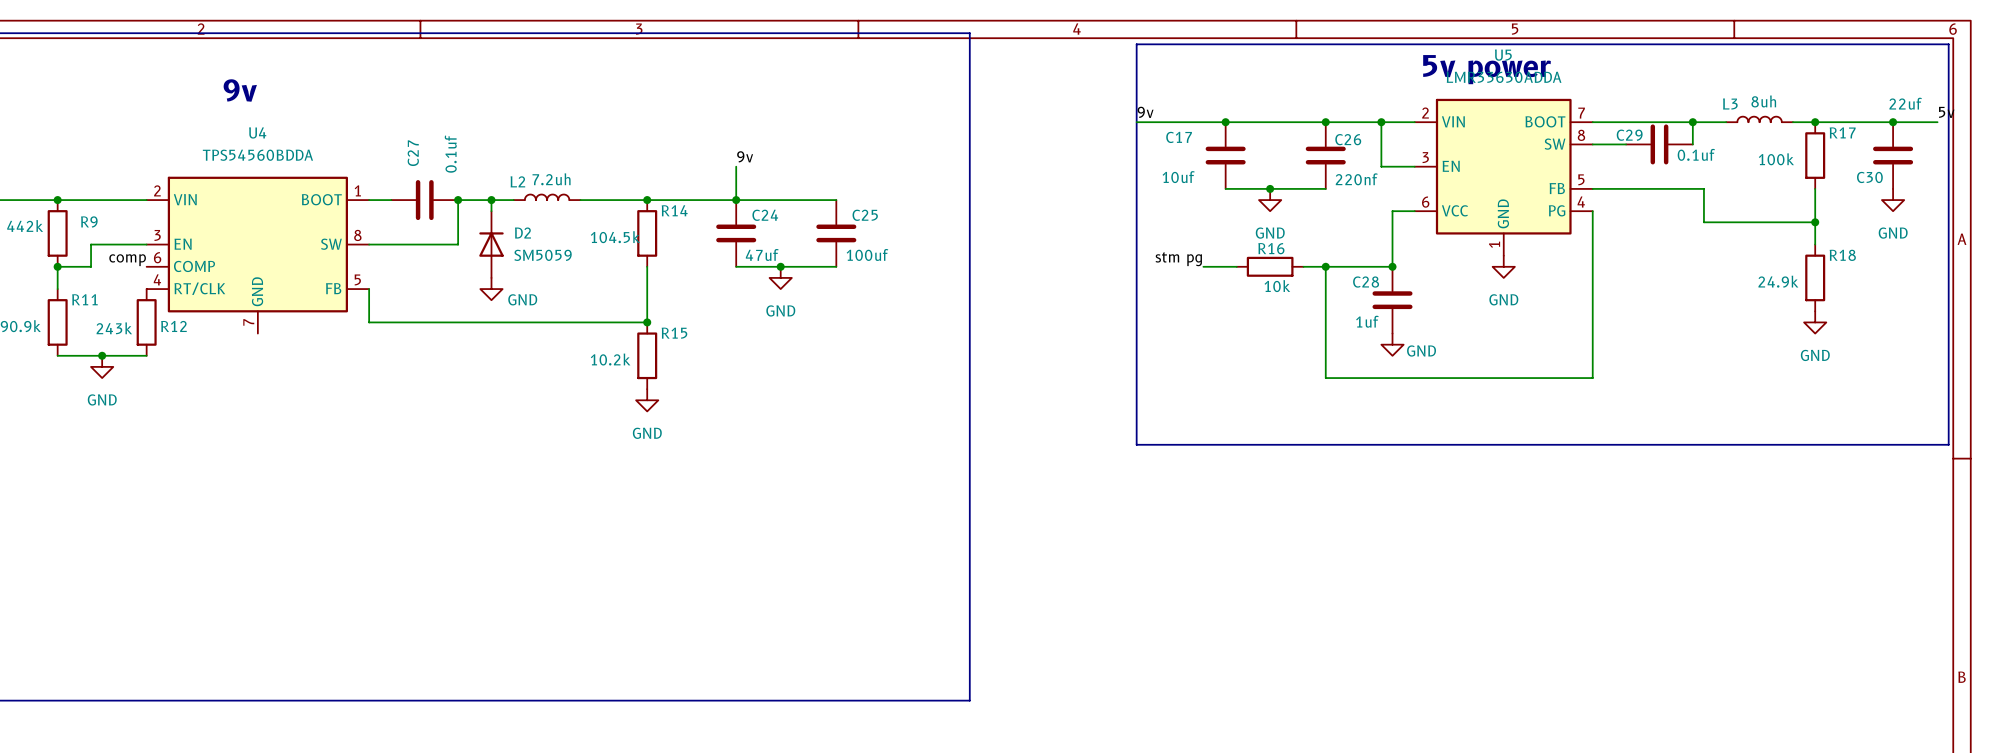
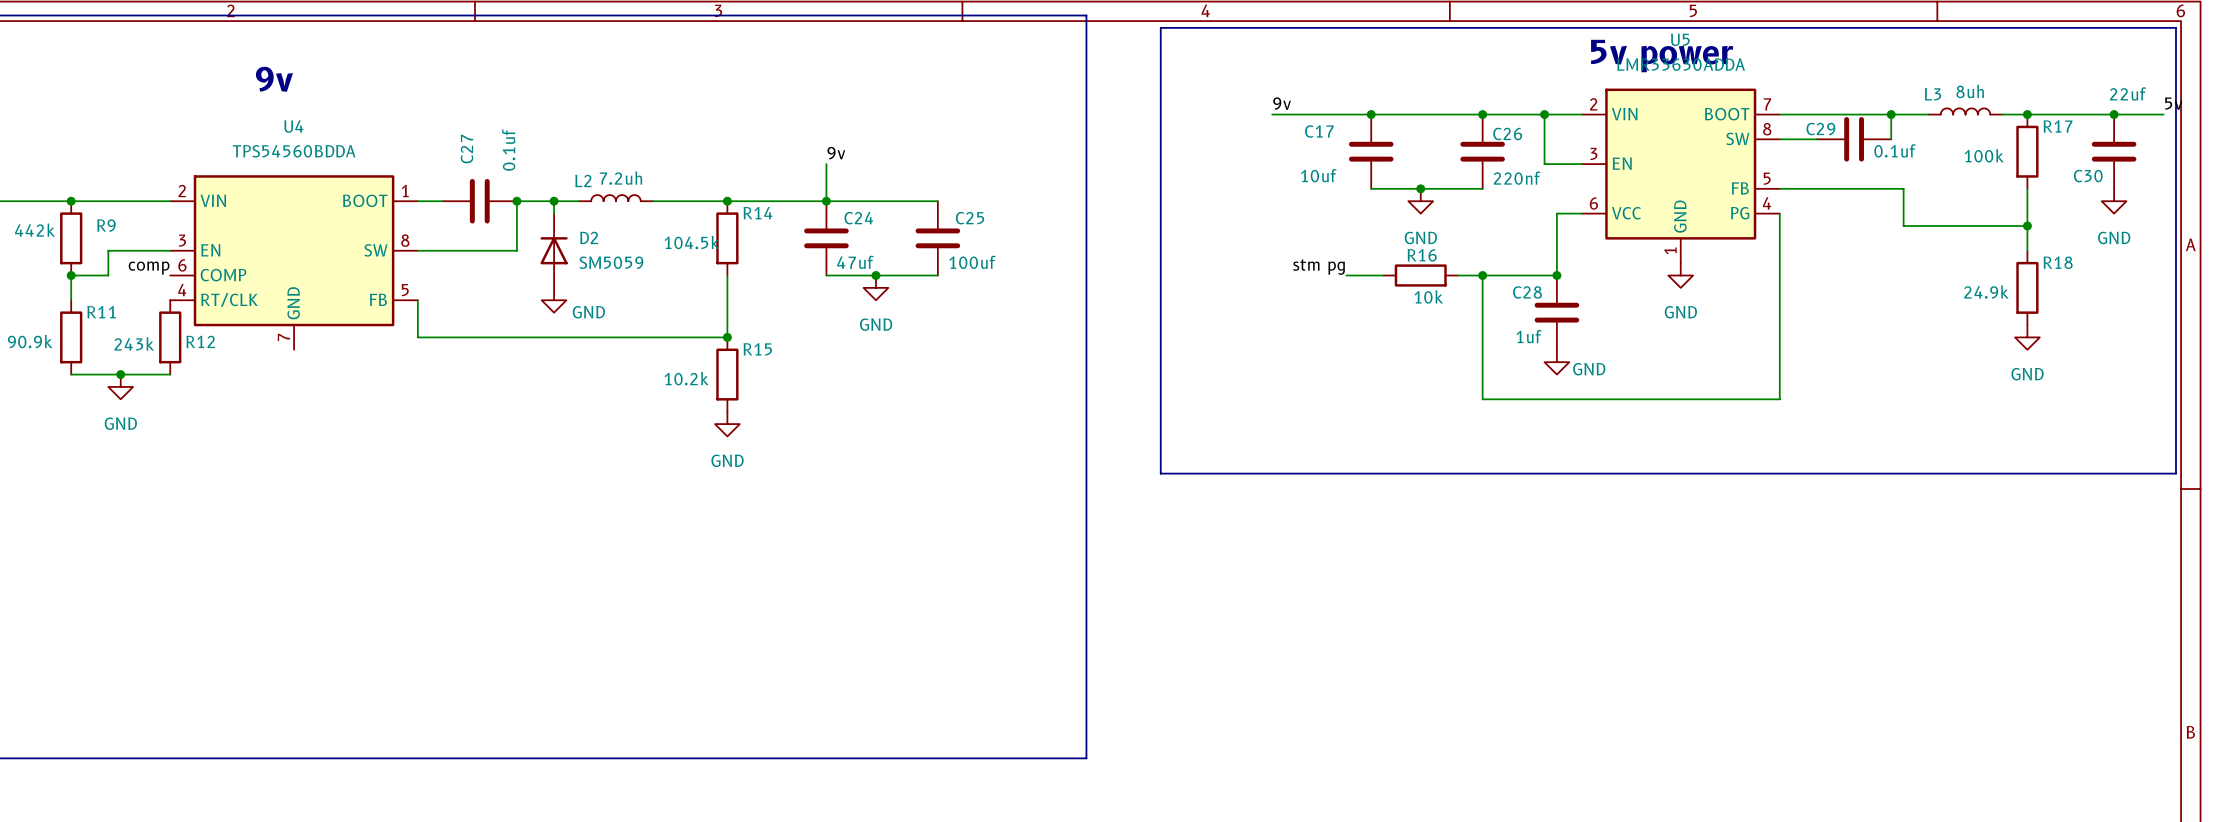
line: (1136, 44) (1136, 444) -> (1272, 27) (1160, 27) (1160, 473) (1272, 473)

